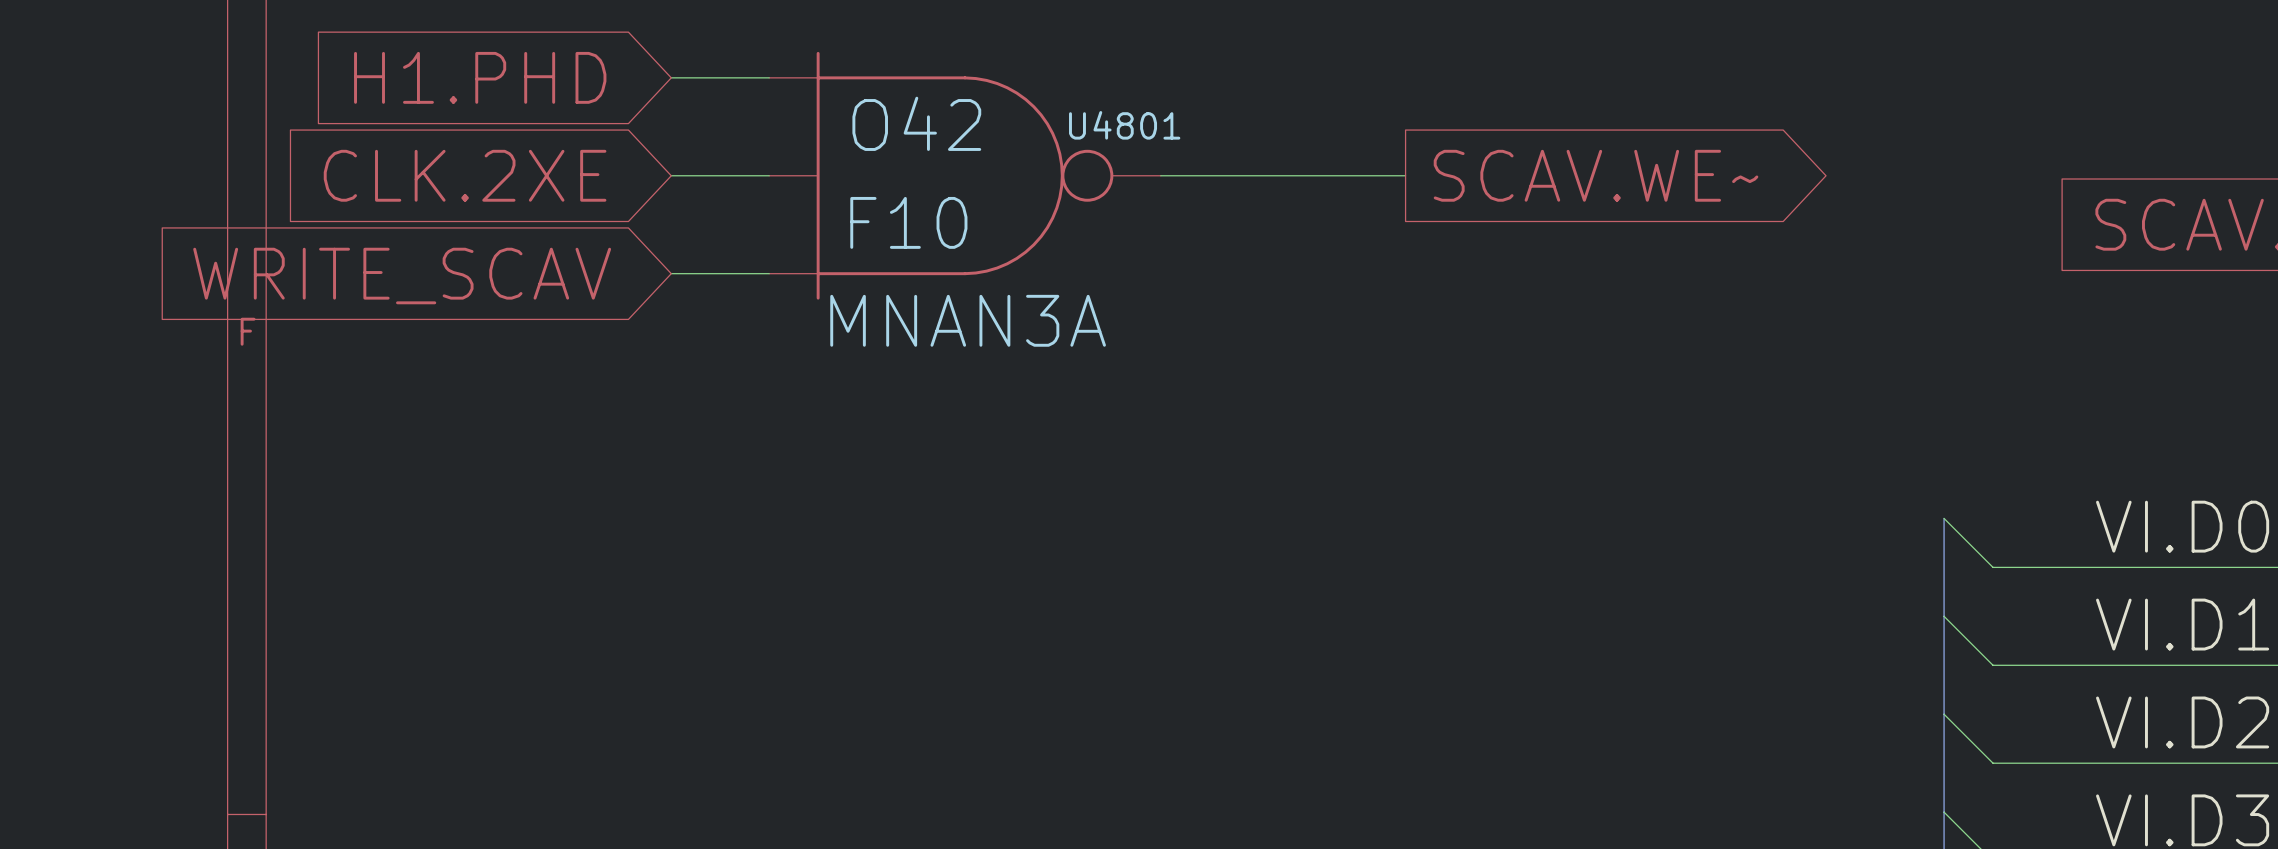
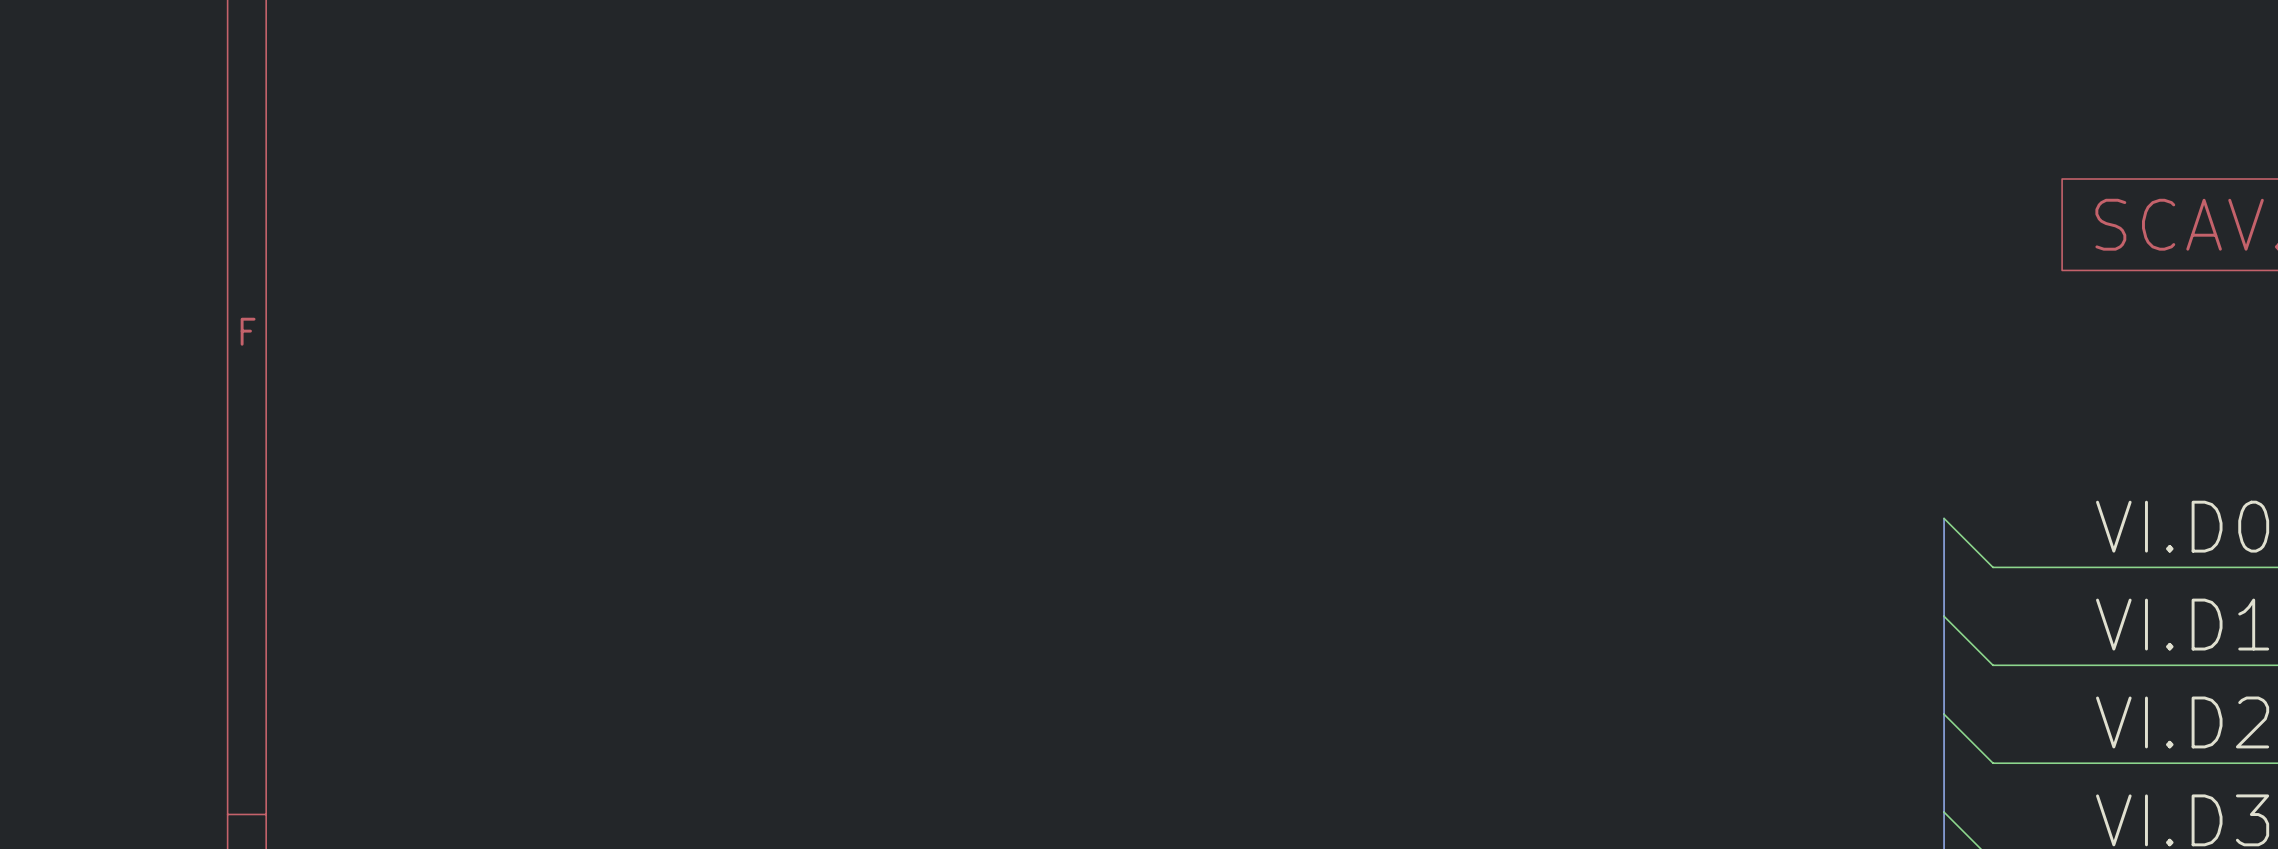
global label: H1.PHD (480, 77) -> none
wire: (671, 77) (769, 77) -> none
global label: CLK.2XE (465, 175) -> none
wire: (671, 175) (769, 175) -> none
U4801: F10 (965, 175) -> none
wire: (1160, 175) (1405, 175) -> none
global label: SCAV.WE~ (1596, 175) -> none
wire: (671, 273) (769, 273) -> none
global label: WRITE_SCAV (402, 276) -> none

